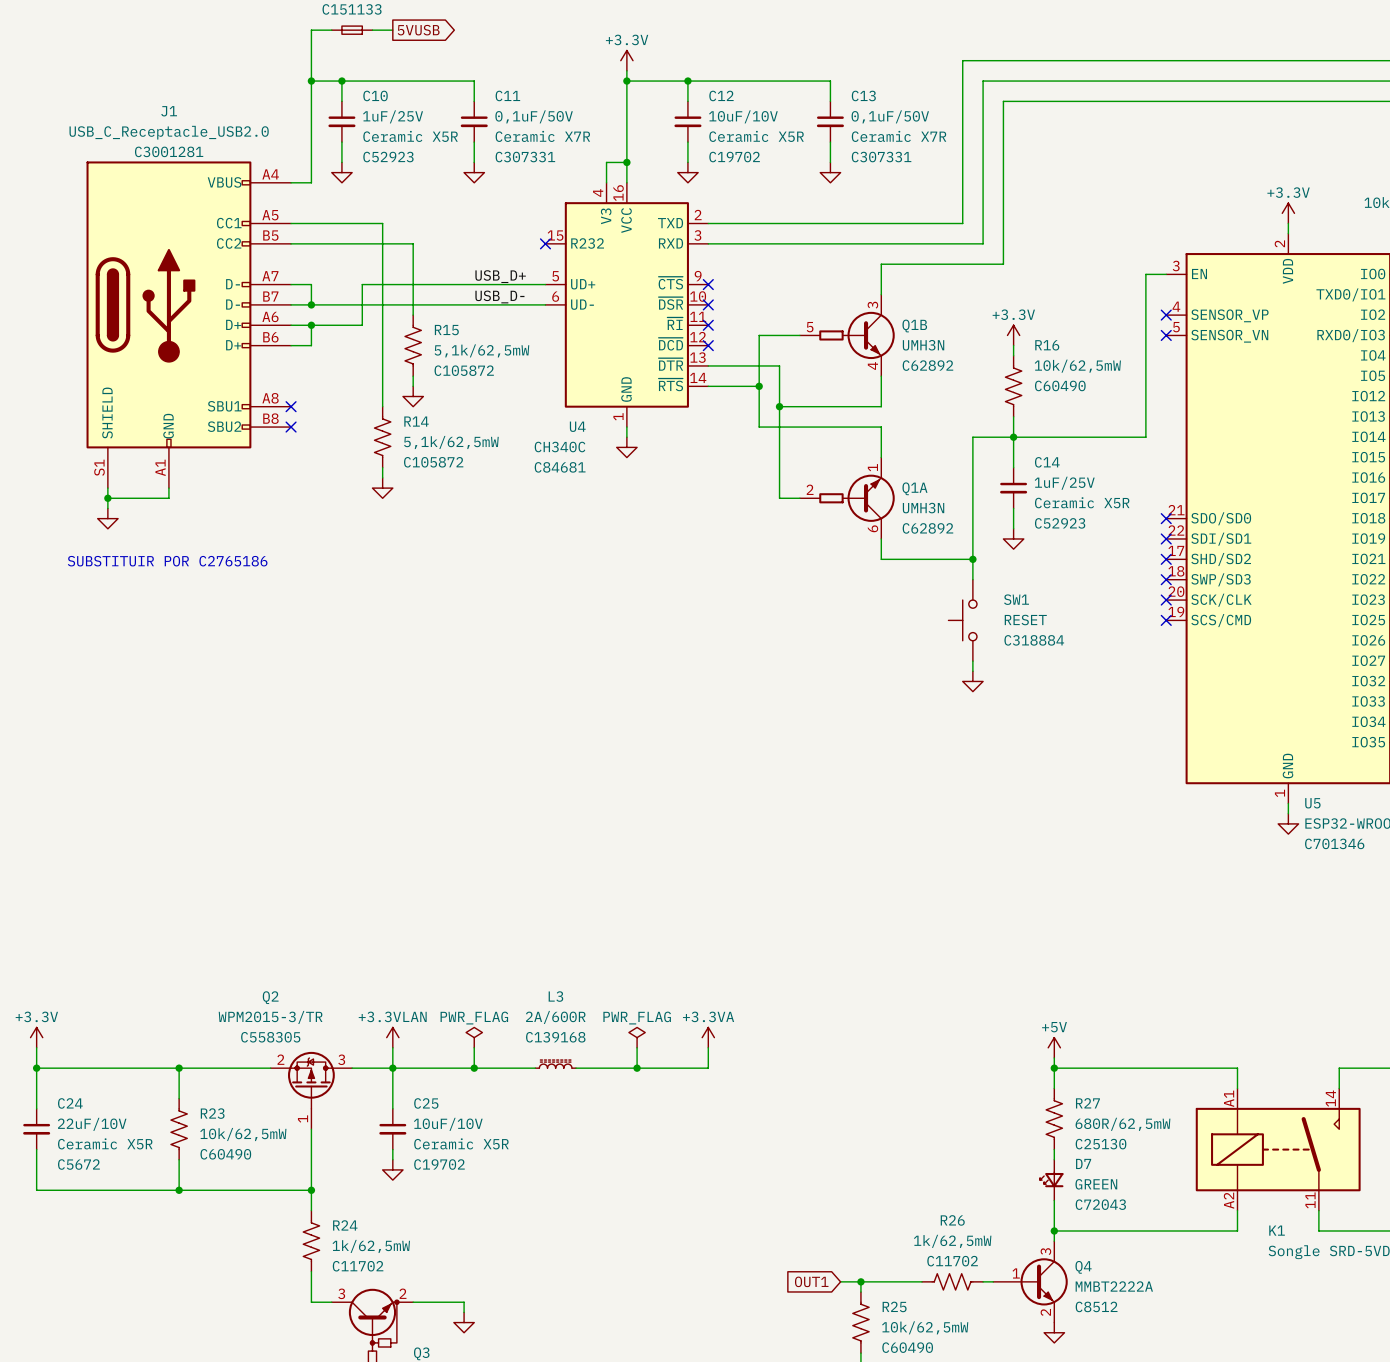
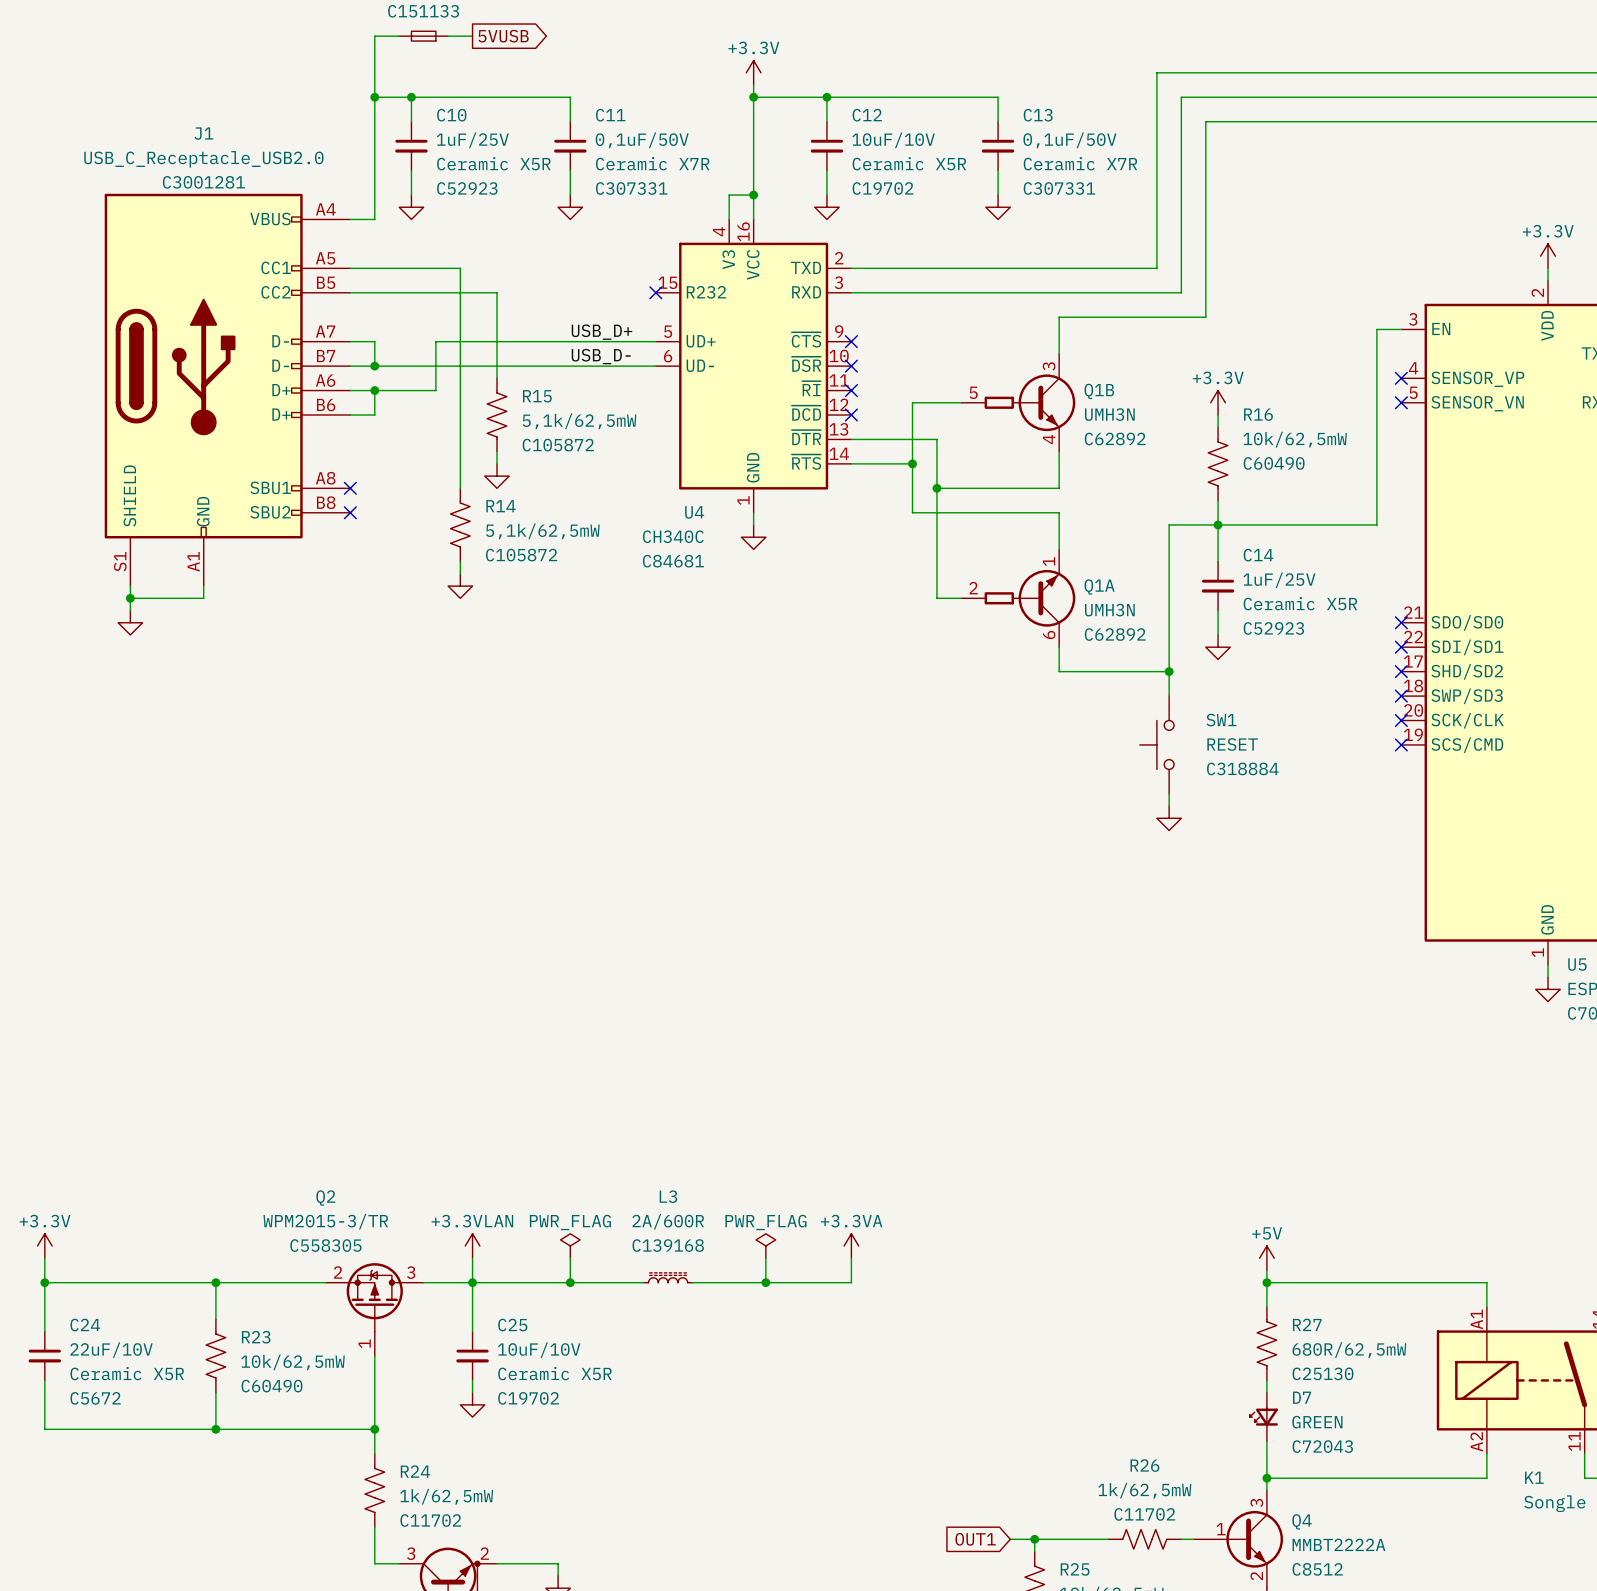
text: SUBSTITUIR POR C2765186 (167, 561) -> none

